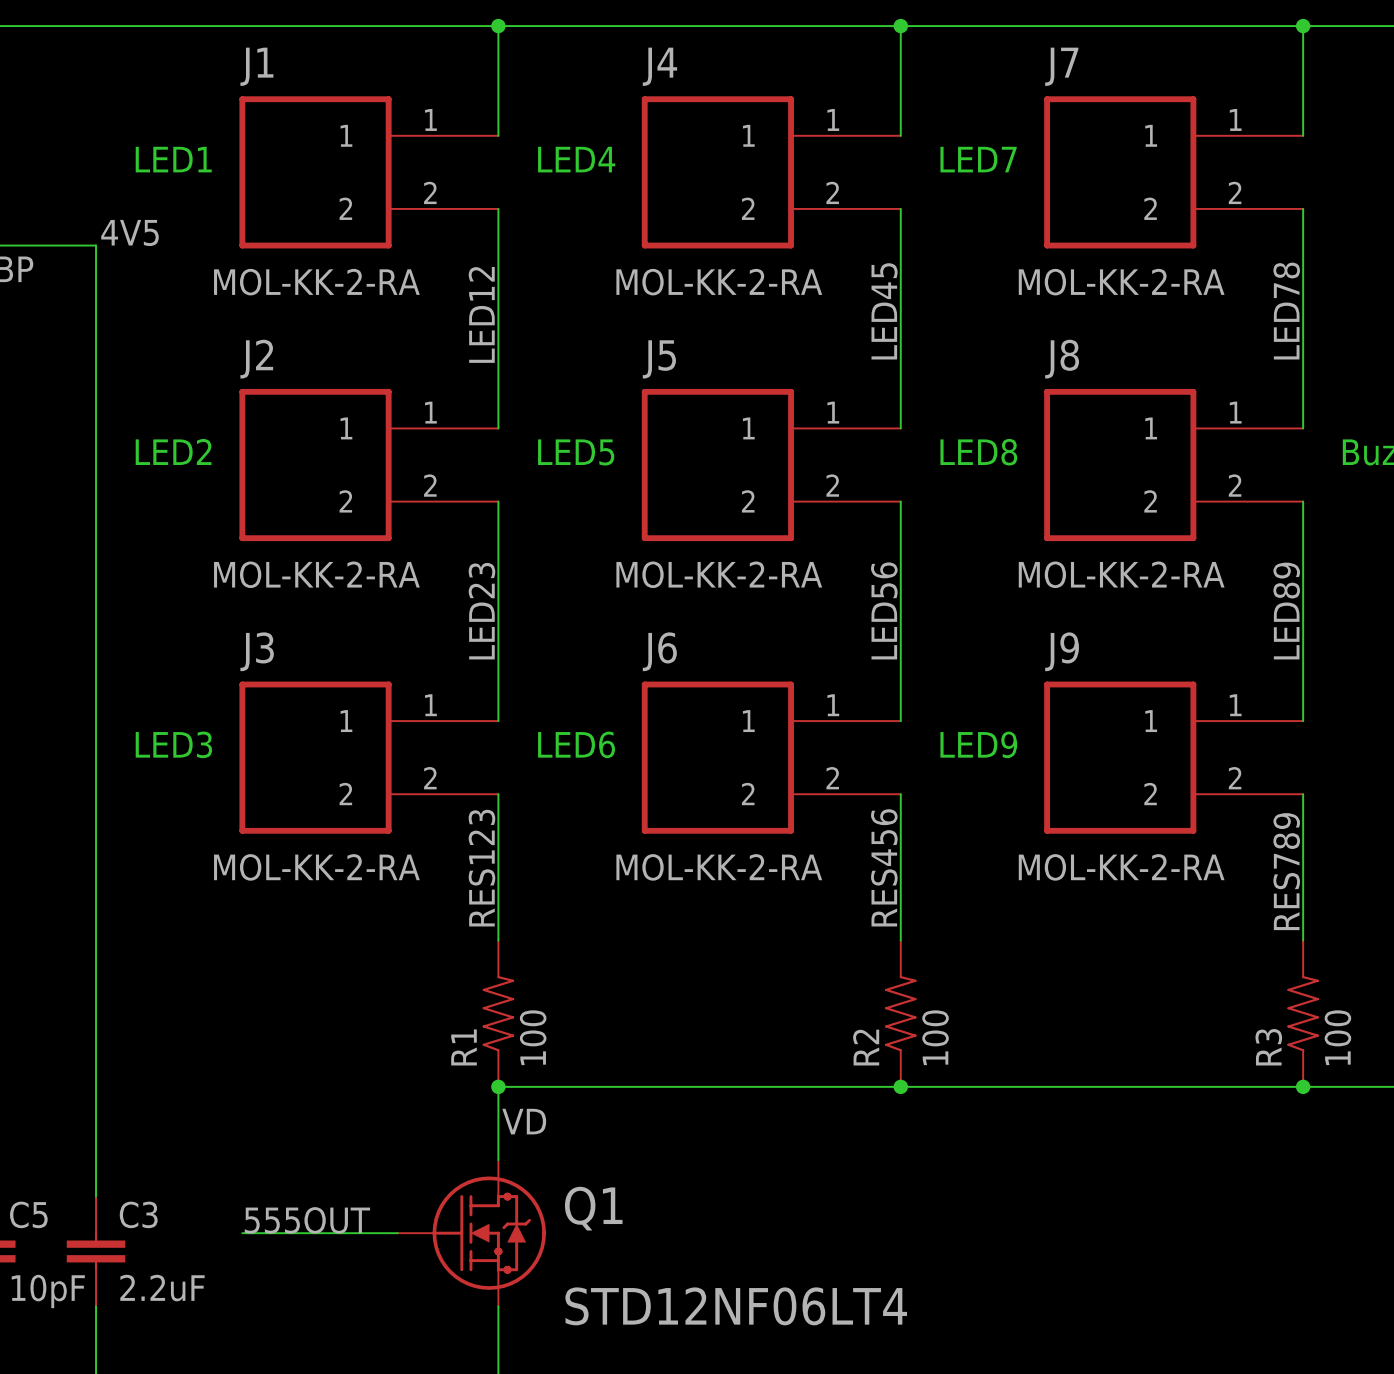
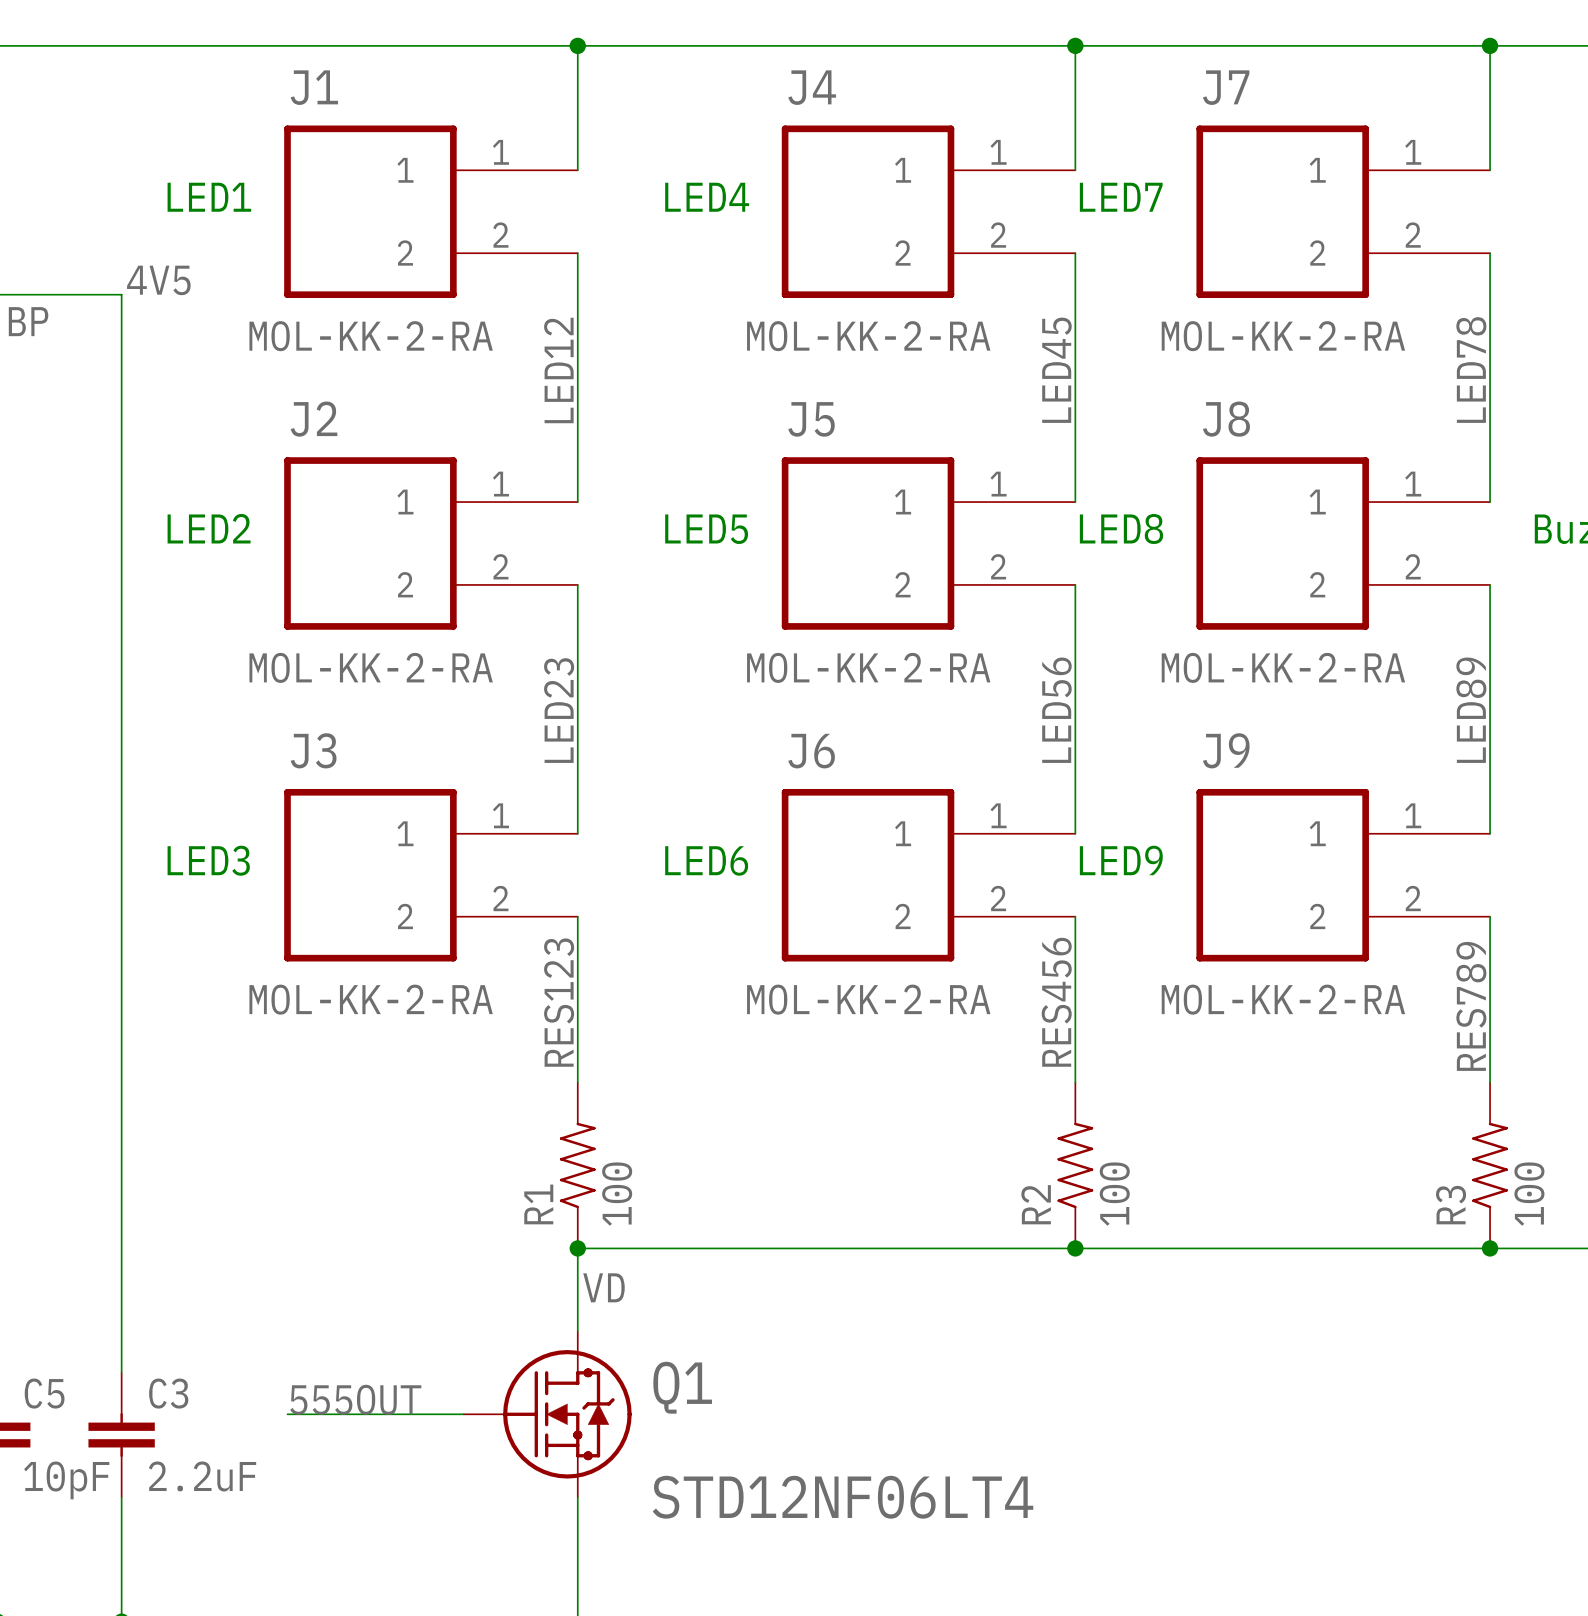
wire: (900, 26) (900, 135) -> (1075, 45) (1075, 170)
junction position: (900, 26) -> (1075, 45)
text position: LED4 (576, 159) -> LED4 (707, 197)
J4 position: (771, 172) -> (928, 211)
wire: (900, 208) (900, 428) -> (1075, 253) (1075, 502)
label position: LED45 (884, 311) -> LED45 (1056, 370)
text position: LED5 (576, 452) -> LED5 (706, 529)
J5 position: (771, 465) -> (928, 543)
wire: (900, 501) (900, 721) -> (1075, 584) (1075, 833)
label position: LED56 (884, 610) -> LED56 (1056, 710)
text position: LED6 (576, 744) -> LED6 (706, 860)
J6 position: (771, 757) -> (928, 875)
wire: (900, 794) (900, 940) -> (1075, 916) (1075, 1082)
label position: RES456 (884, 867) -> RES456 (1056, 1002)
R2 position: (900, 1013) -> (1075, 1165)
junction position: (900, 1086) -> (1075, 1248)

